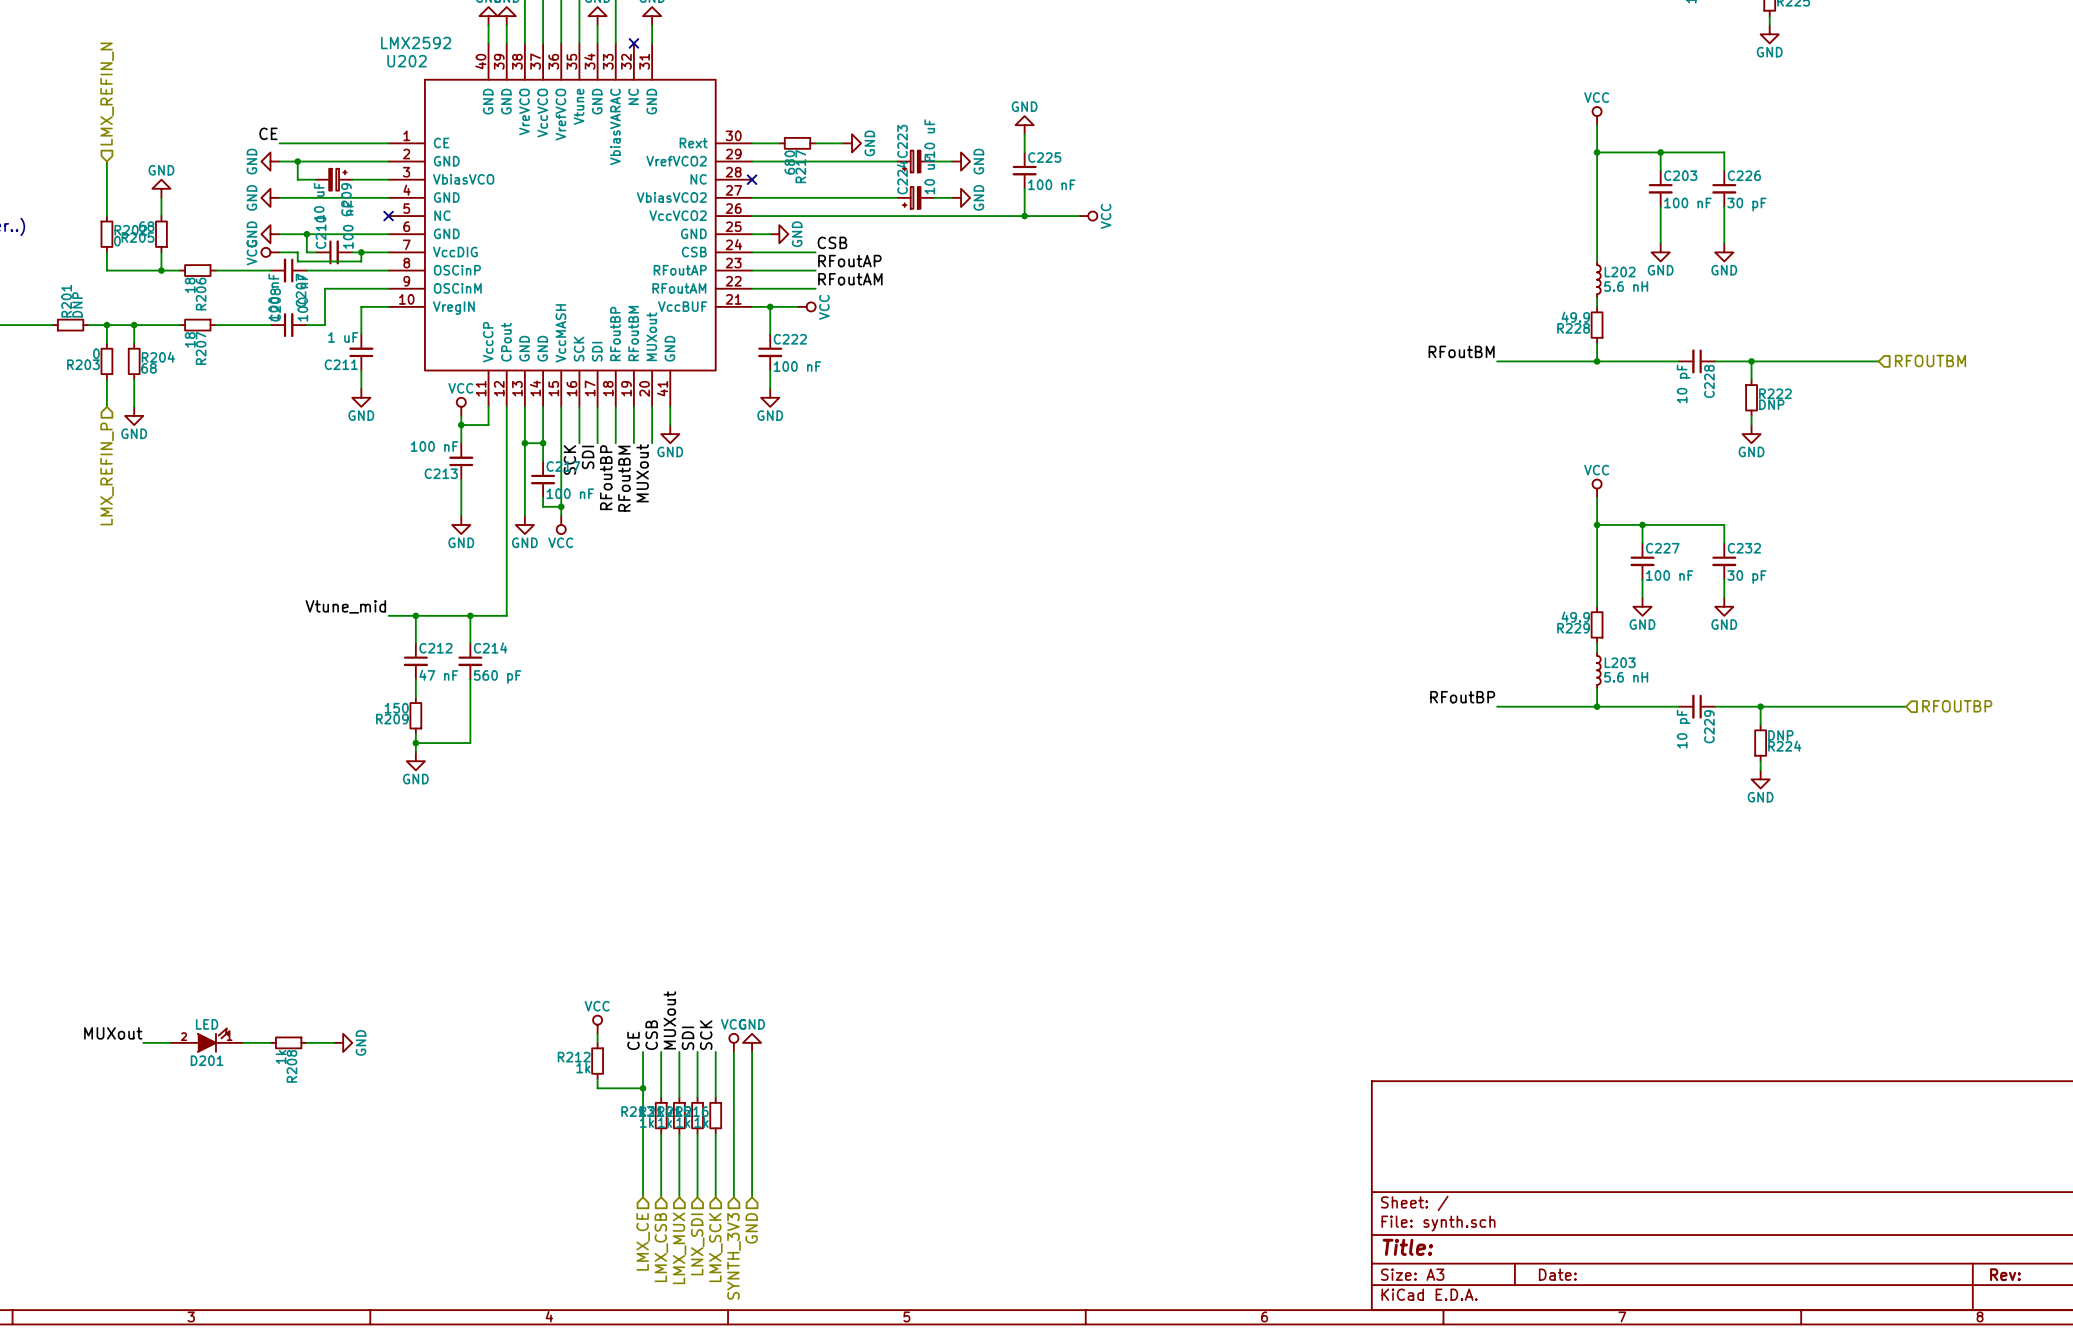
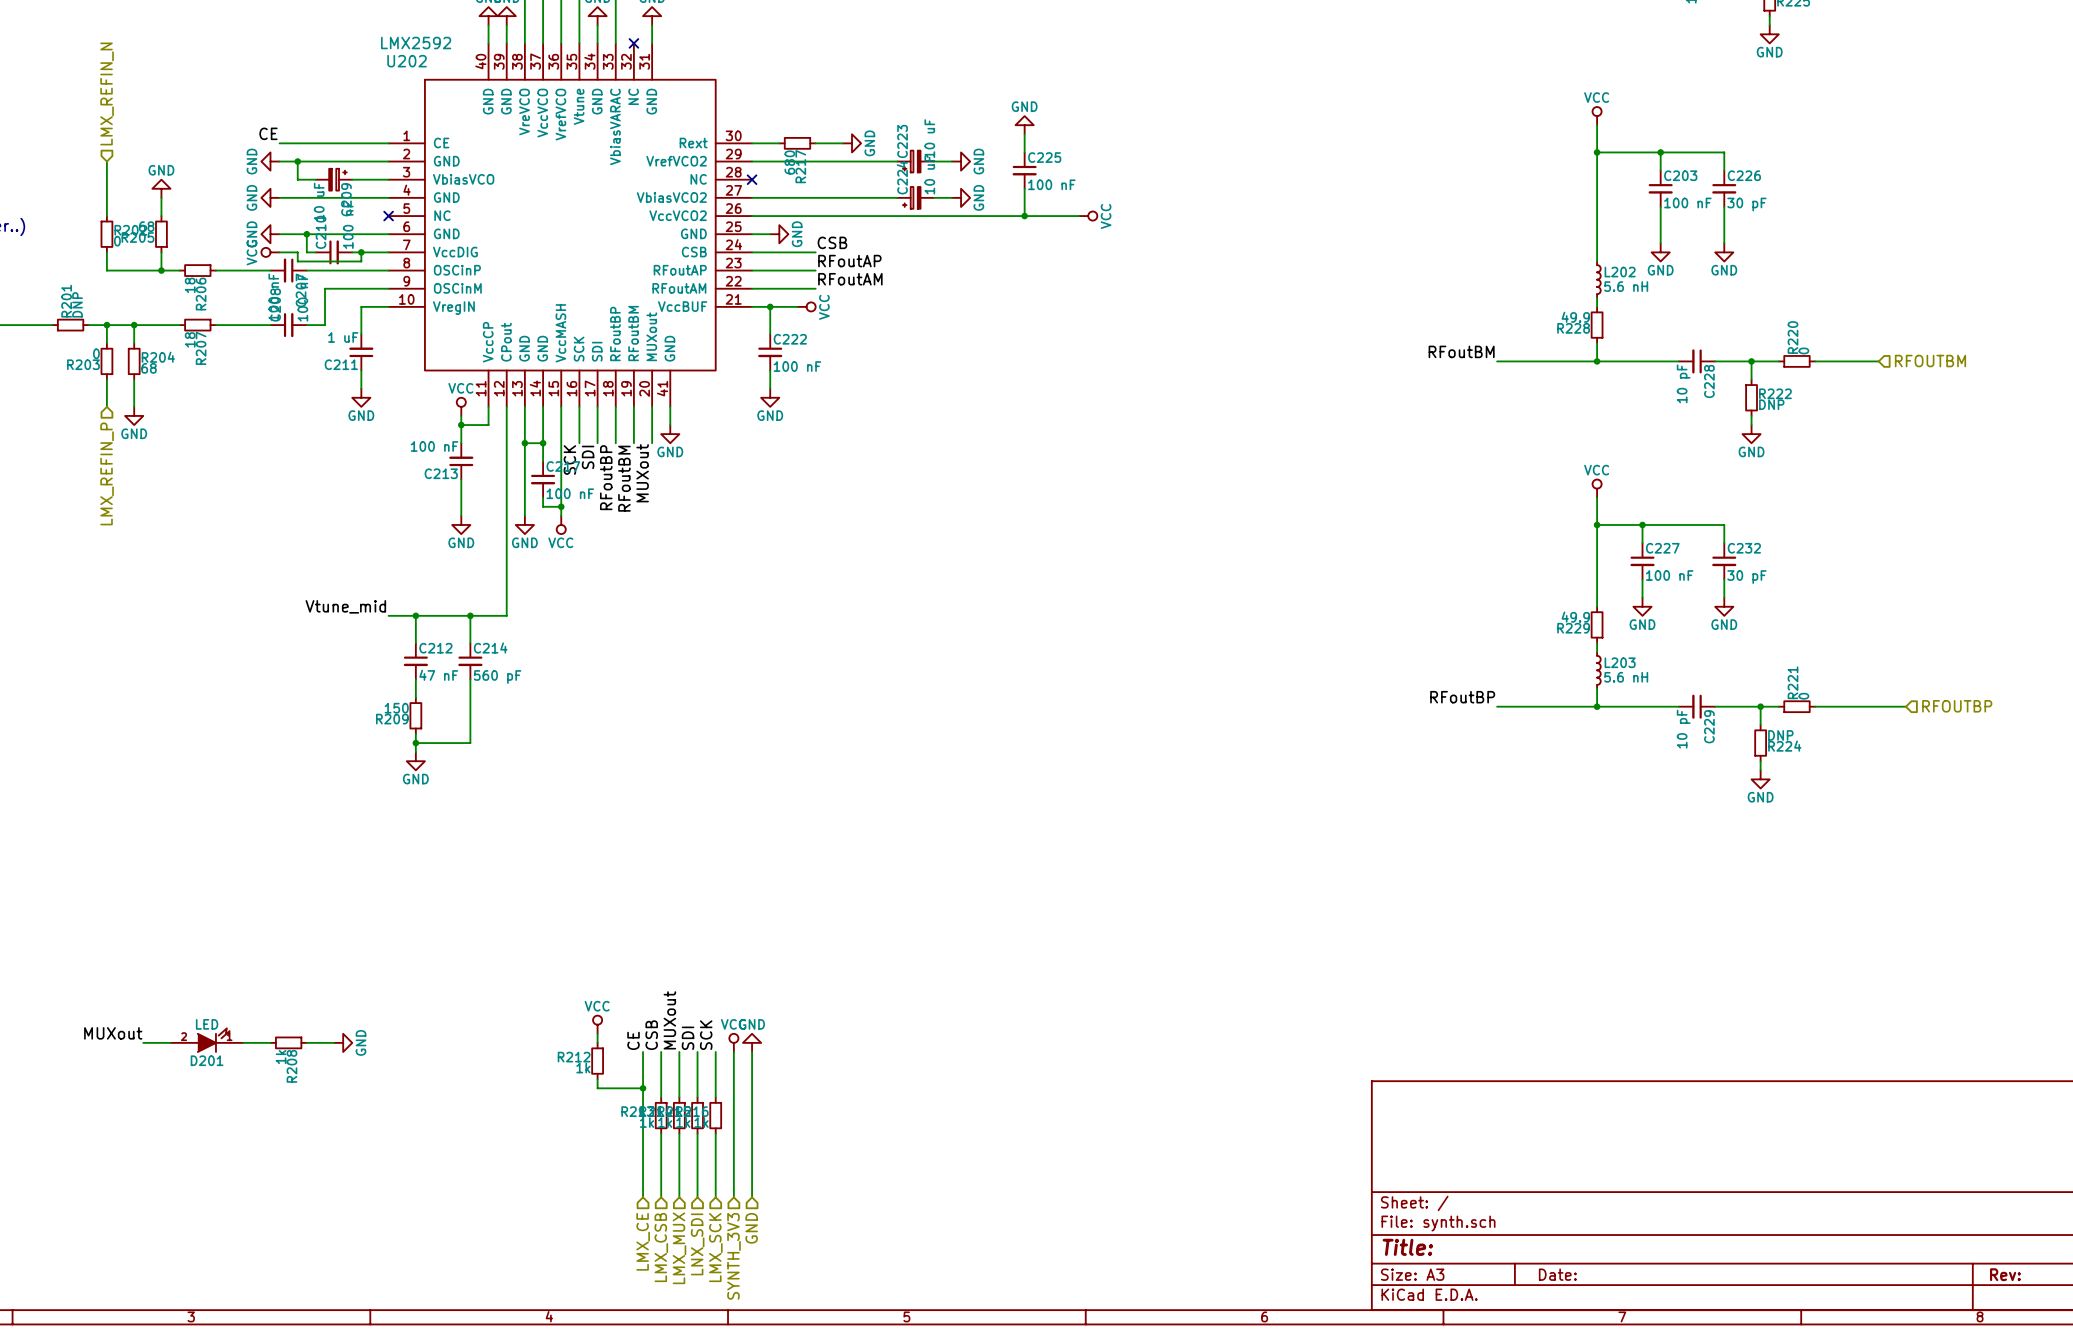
wire: (1778, 361) (1815, 361) -> none
R220: none -> 0 (1796, 361)
wire: (1778, 706) (1815, 706) -> none
R221: none -> 0 (1796, 706)

